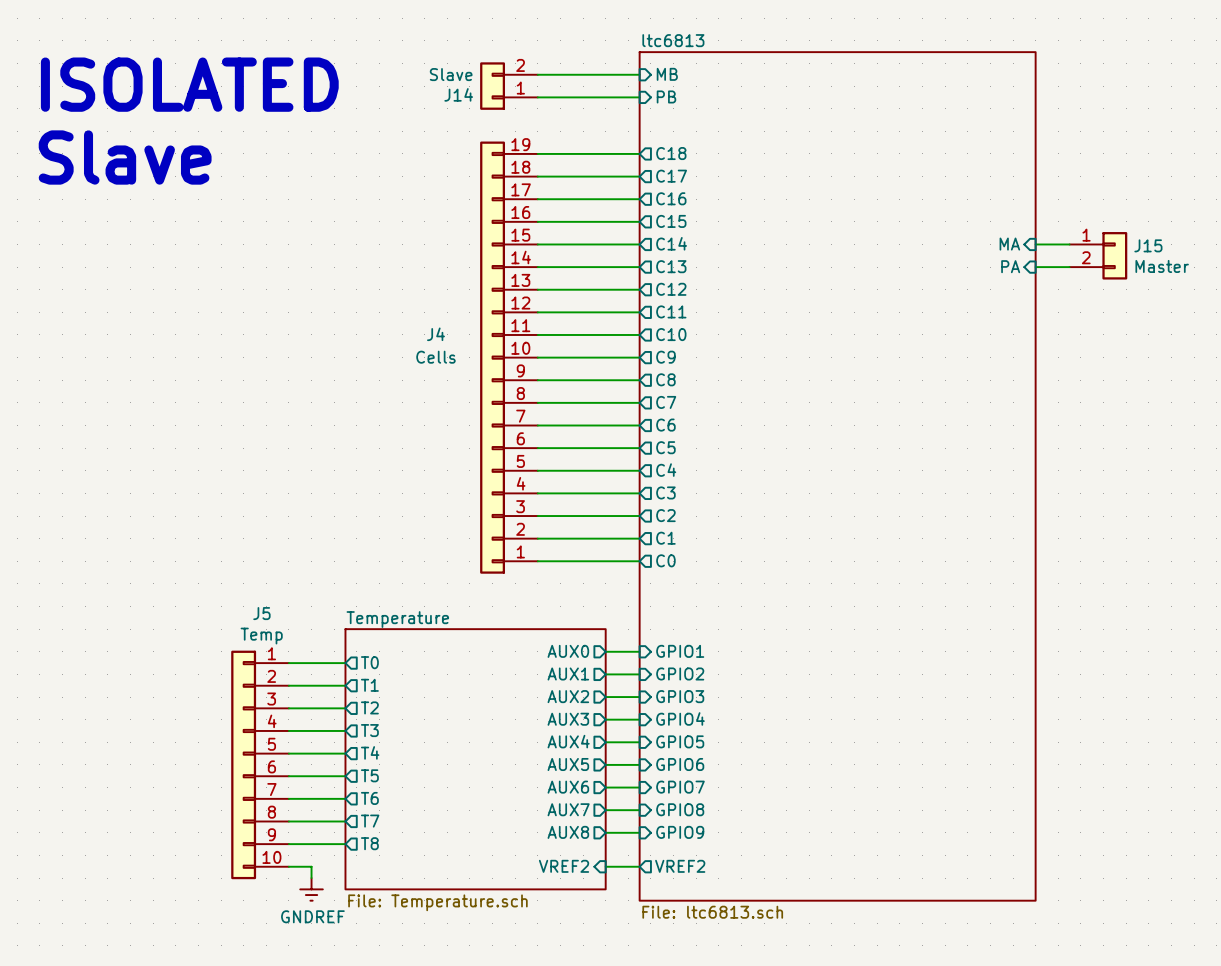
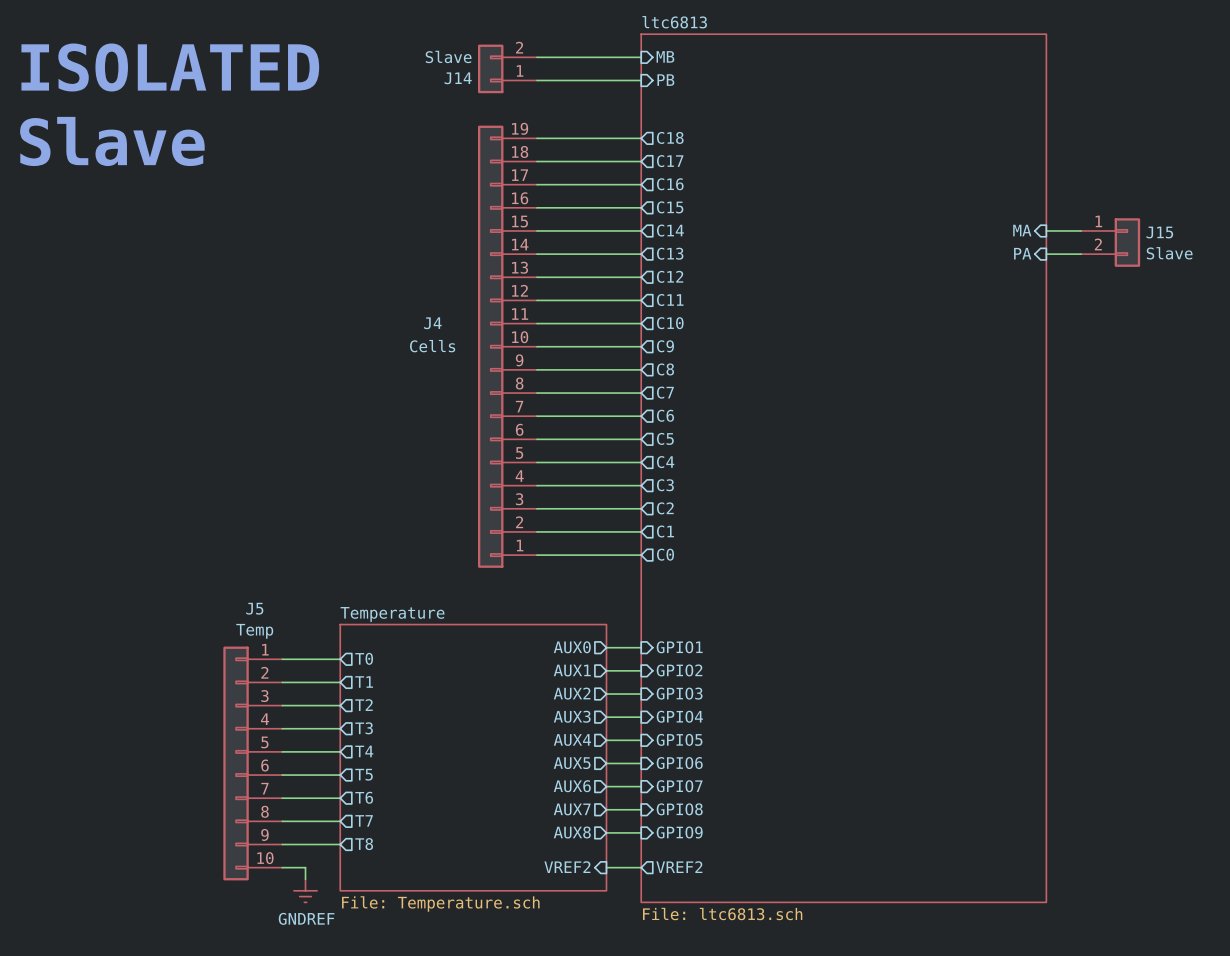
J15 value: Master (1162, 266) -> Slave (1169, 253)

